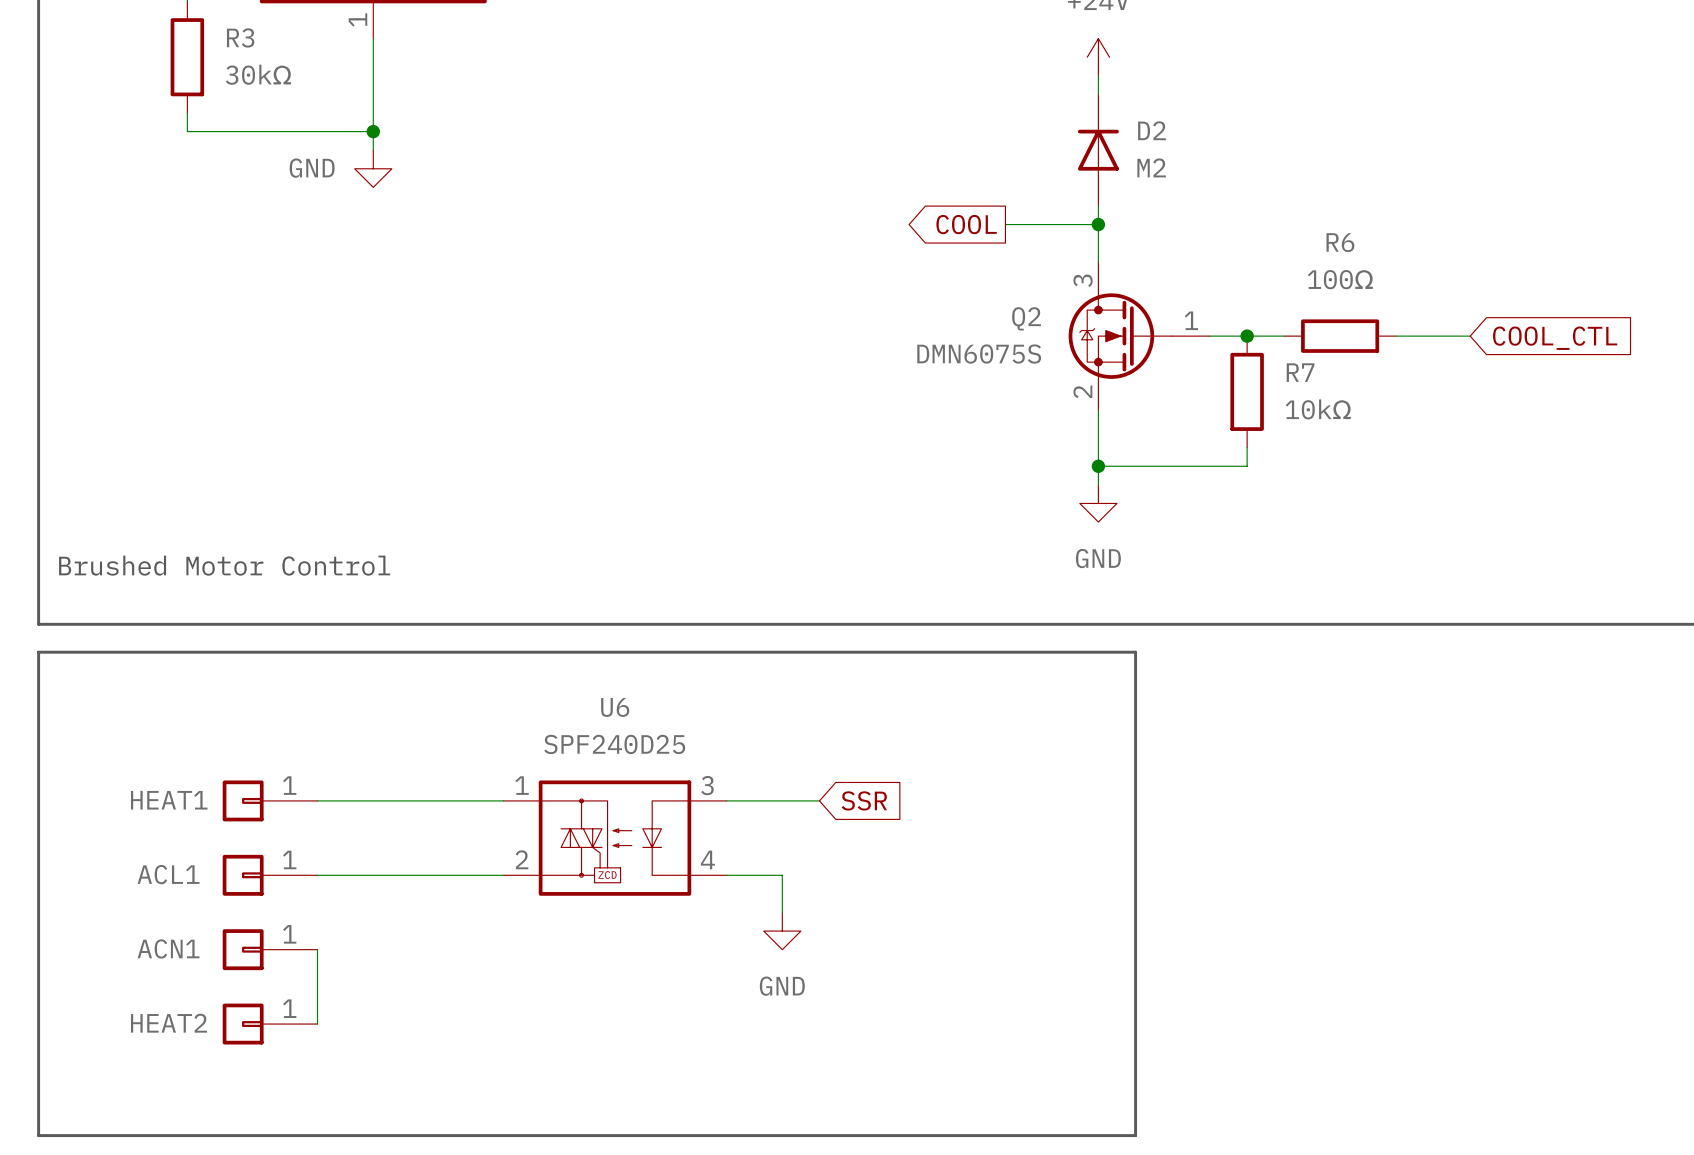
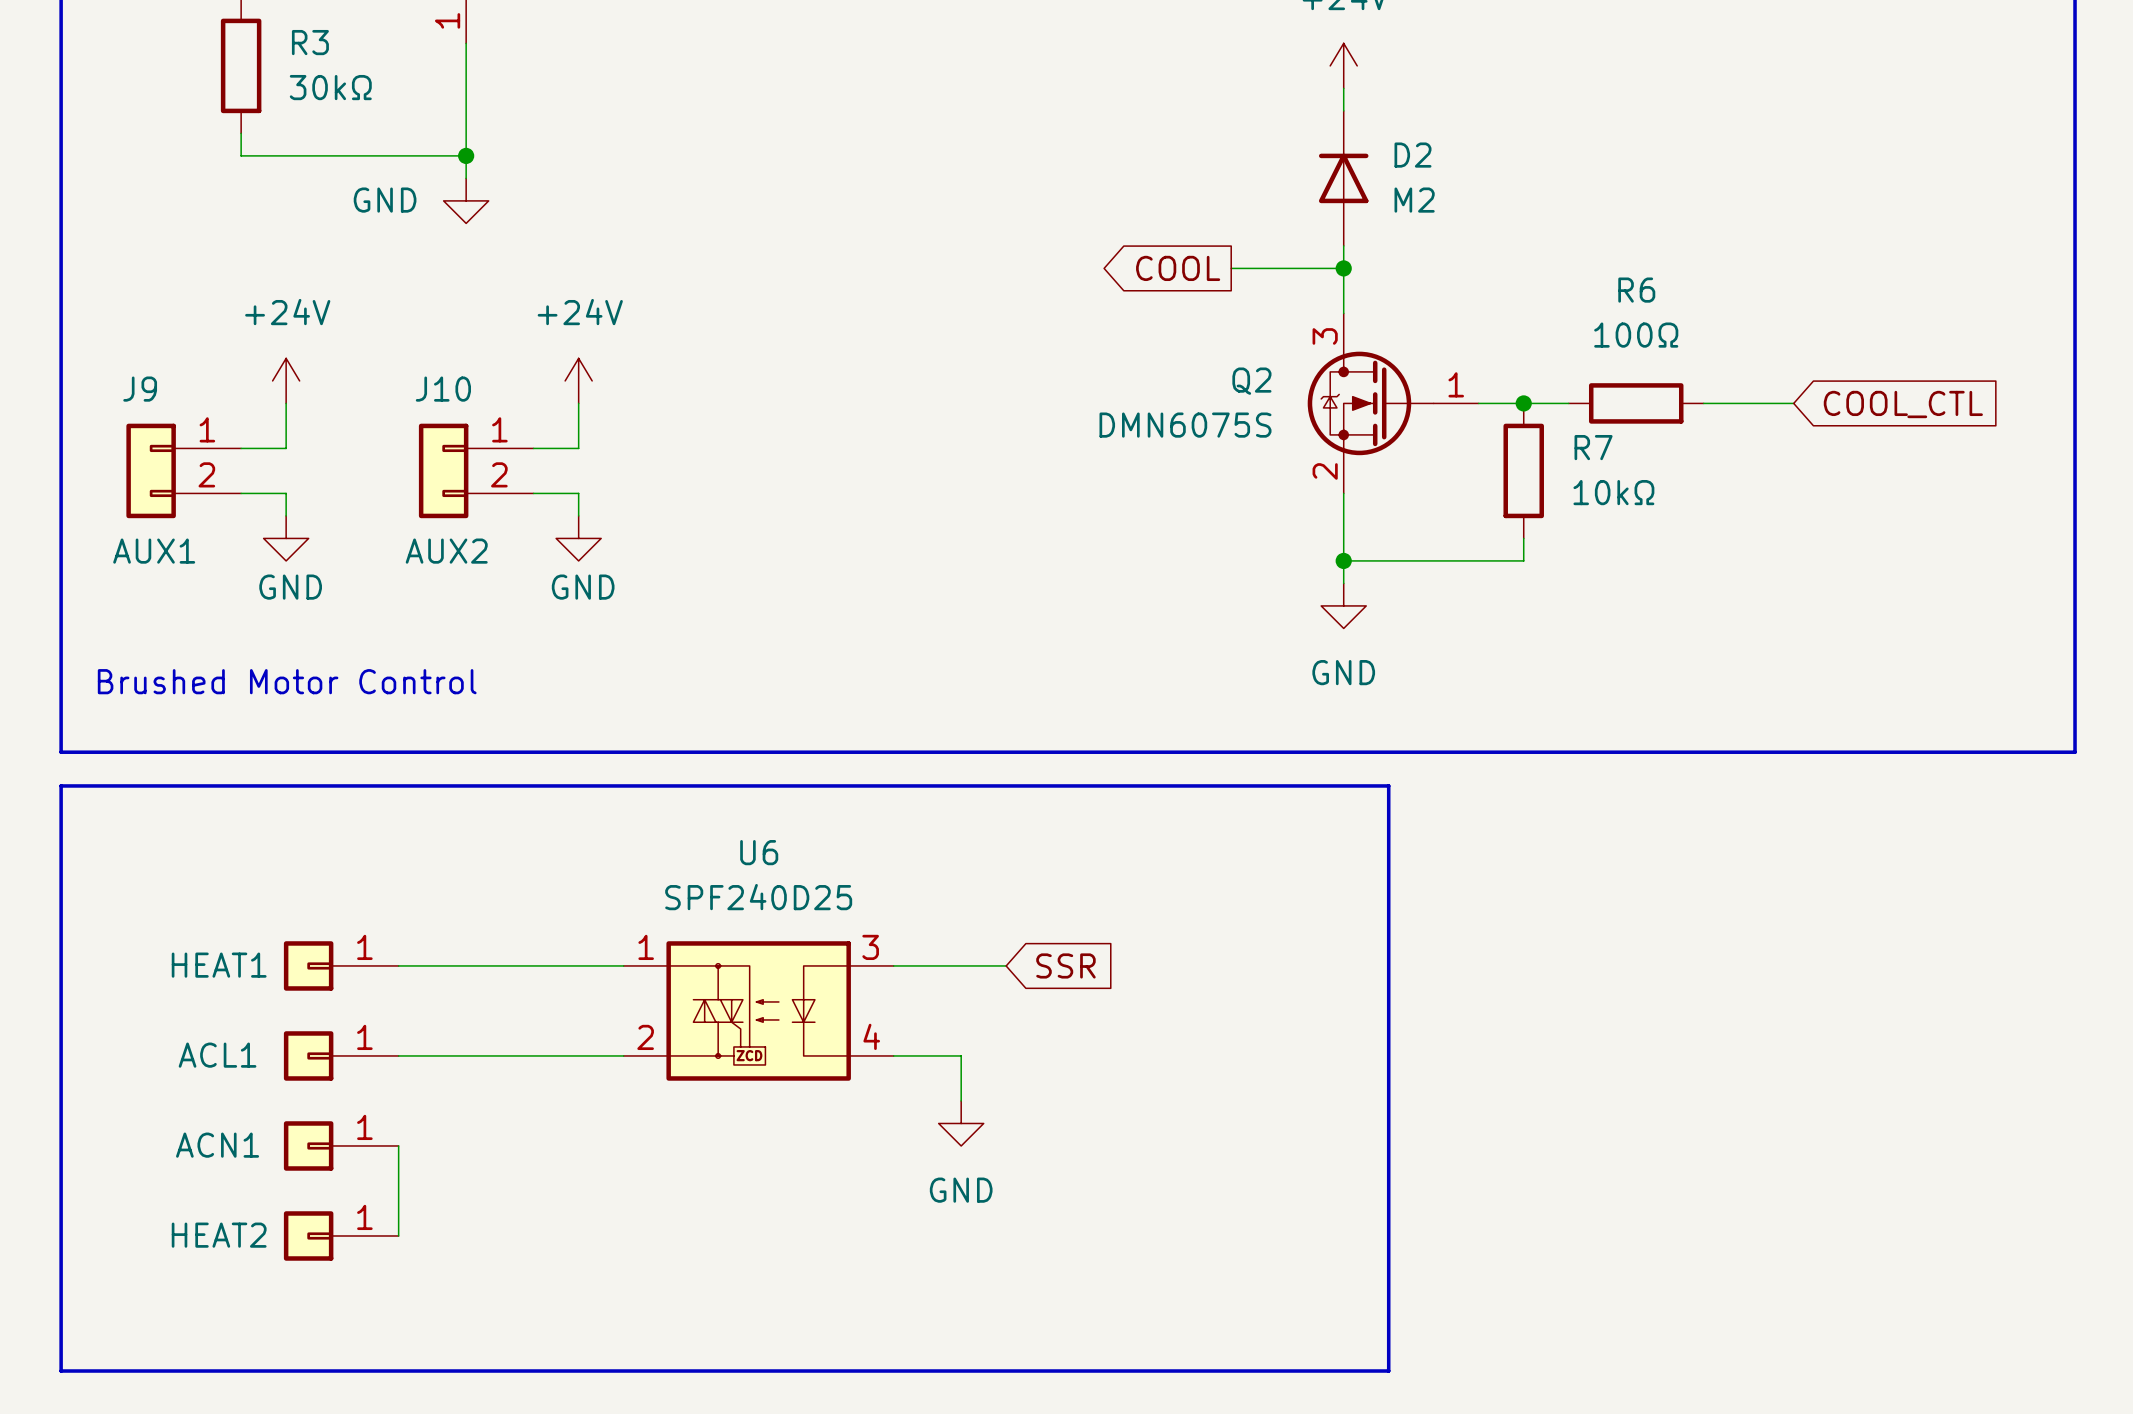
power symbol: none -> +24V (286, 380)
power symbol: none -> +24V (578, 380)
wire: none -> (286, 403) (286, 448) (241, 448)
wire: none -> (578, 403) (578, 448) (533, 448)
J9: none -> AUX1 (183, 470)
J10: none -> AUX2 (476, 470)
wire: none -> (241, 493) (286, 493) (286, 515)
wire: none -> (533, 493) (578, 493) (578, 515)
power symbol: none -> GND (286, 538)
power symbol: none -> GND (578, 538)

